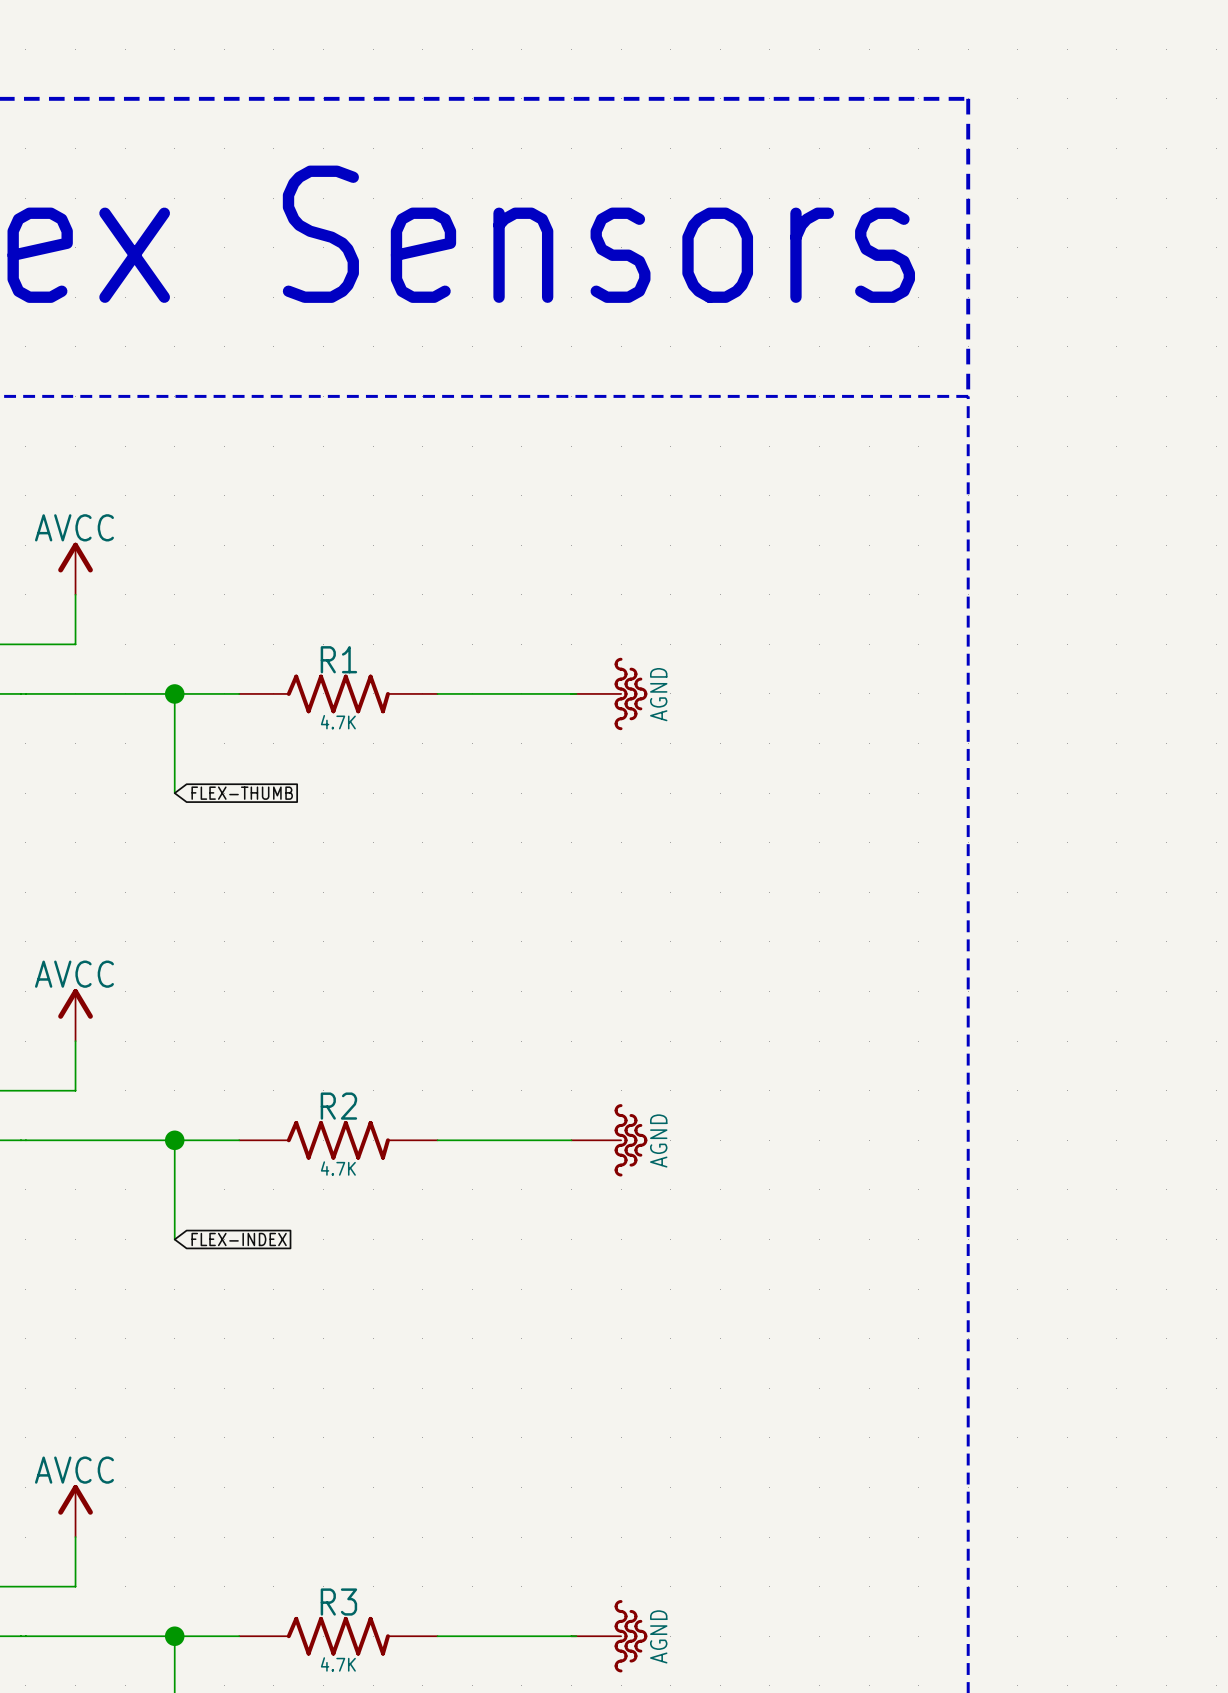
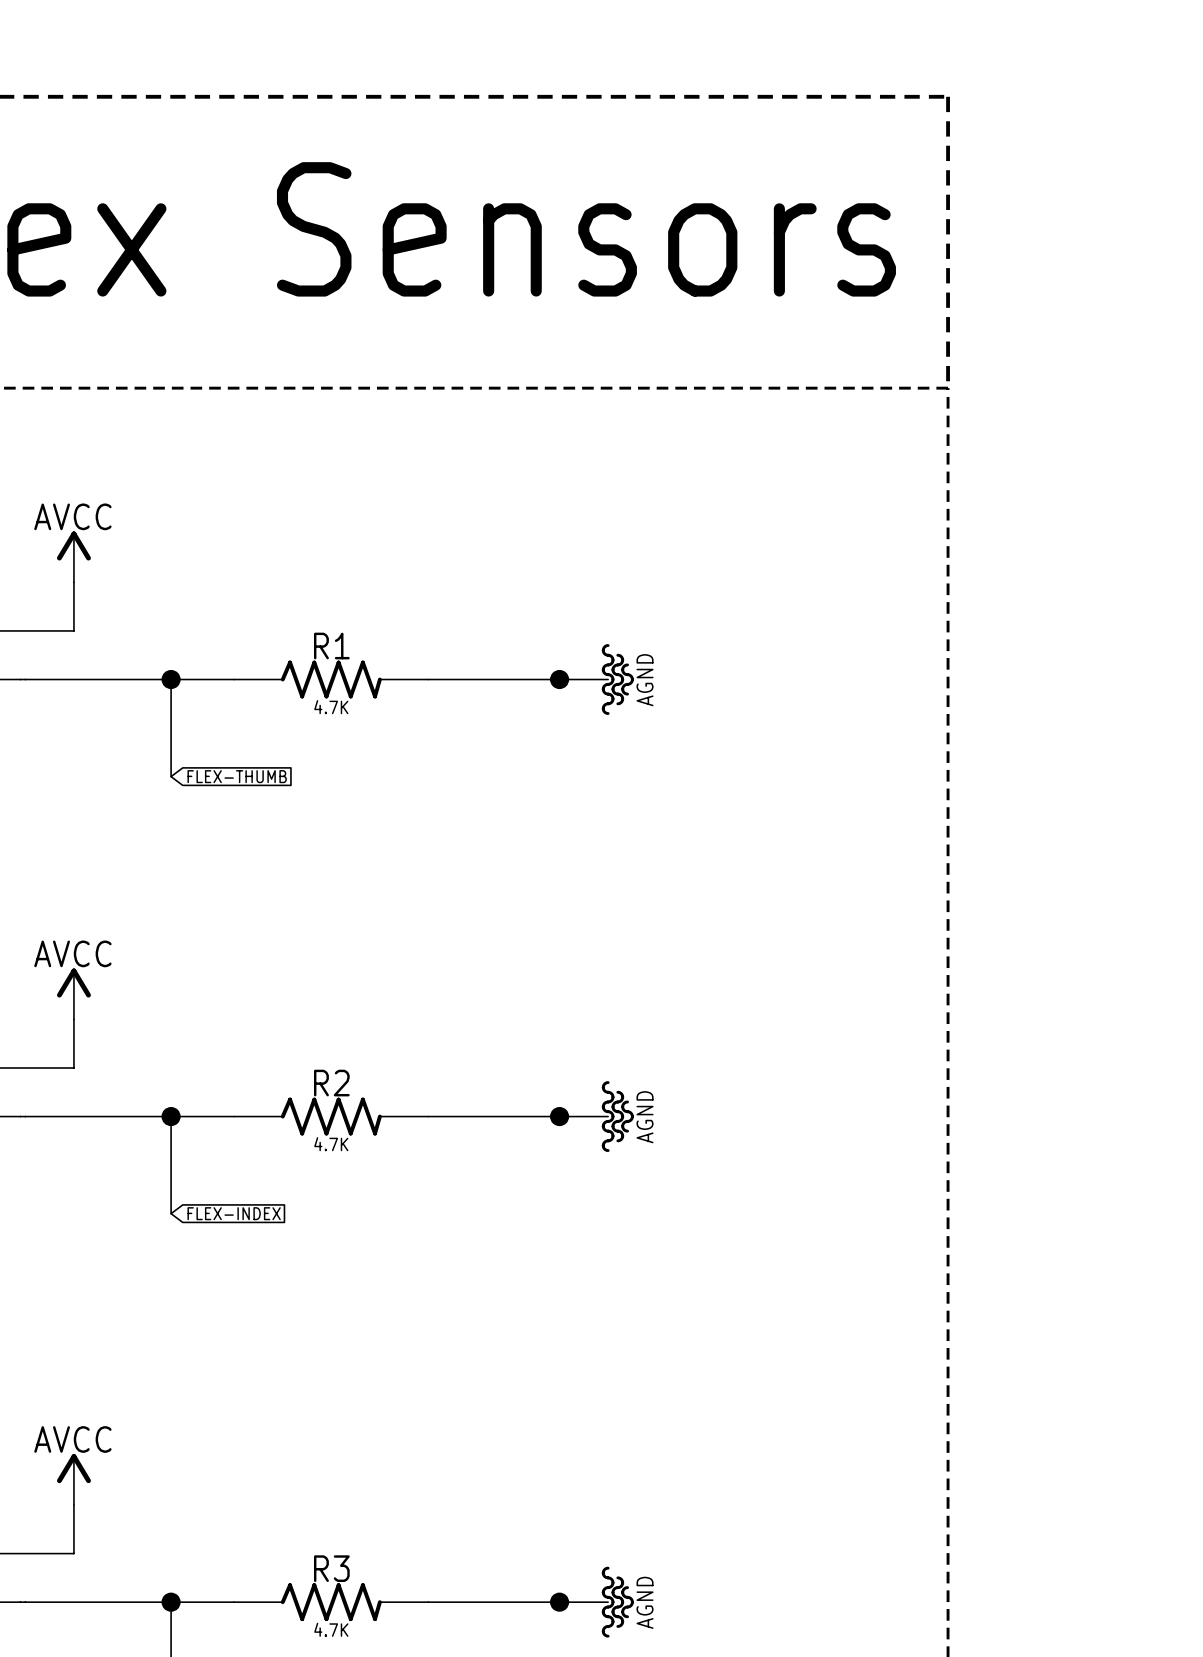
junction: none -> (559, 679)
junction: none -> (559, 1116)
junction: none -> (559, 1602)

